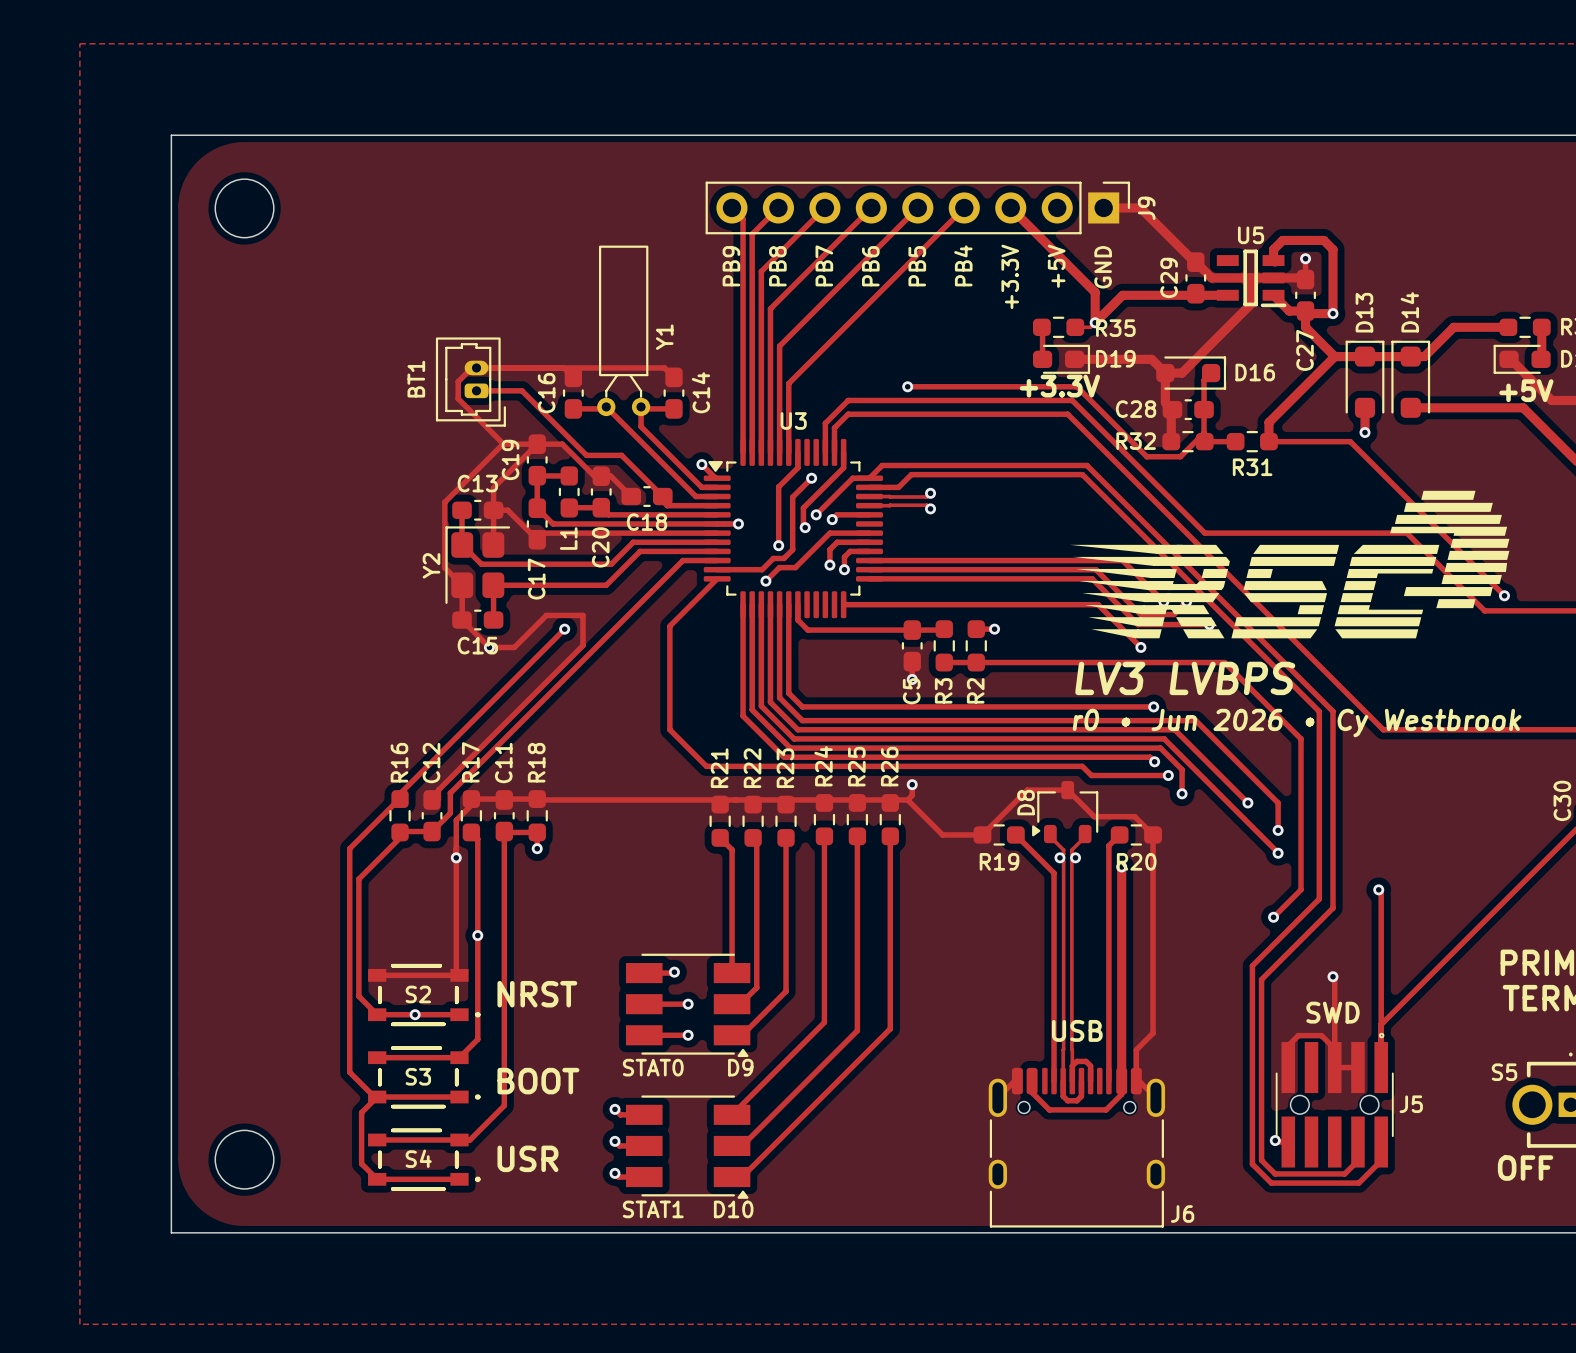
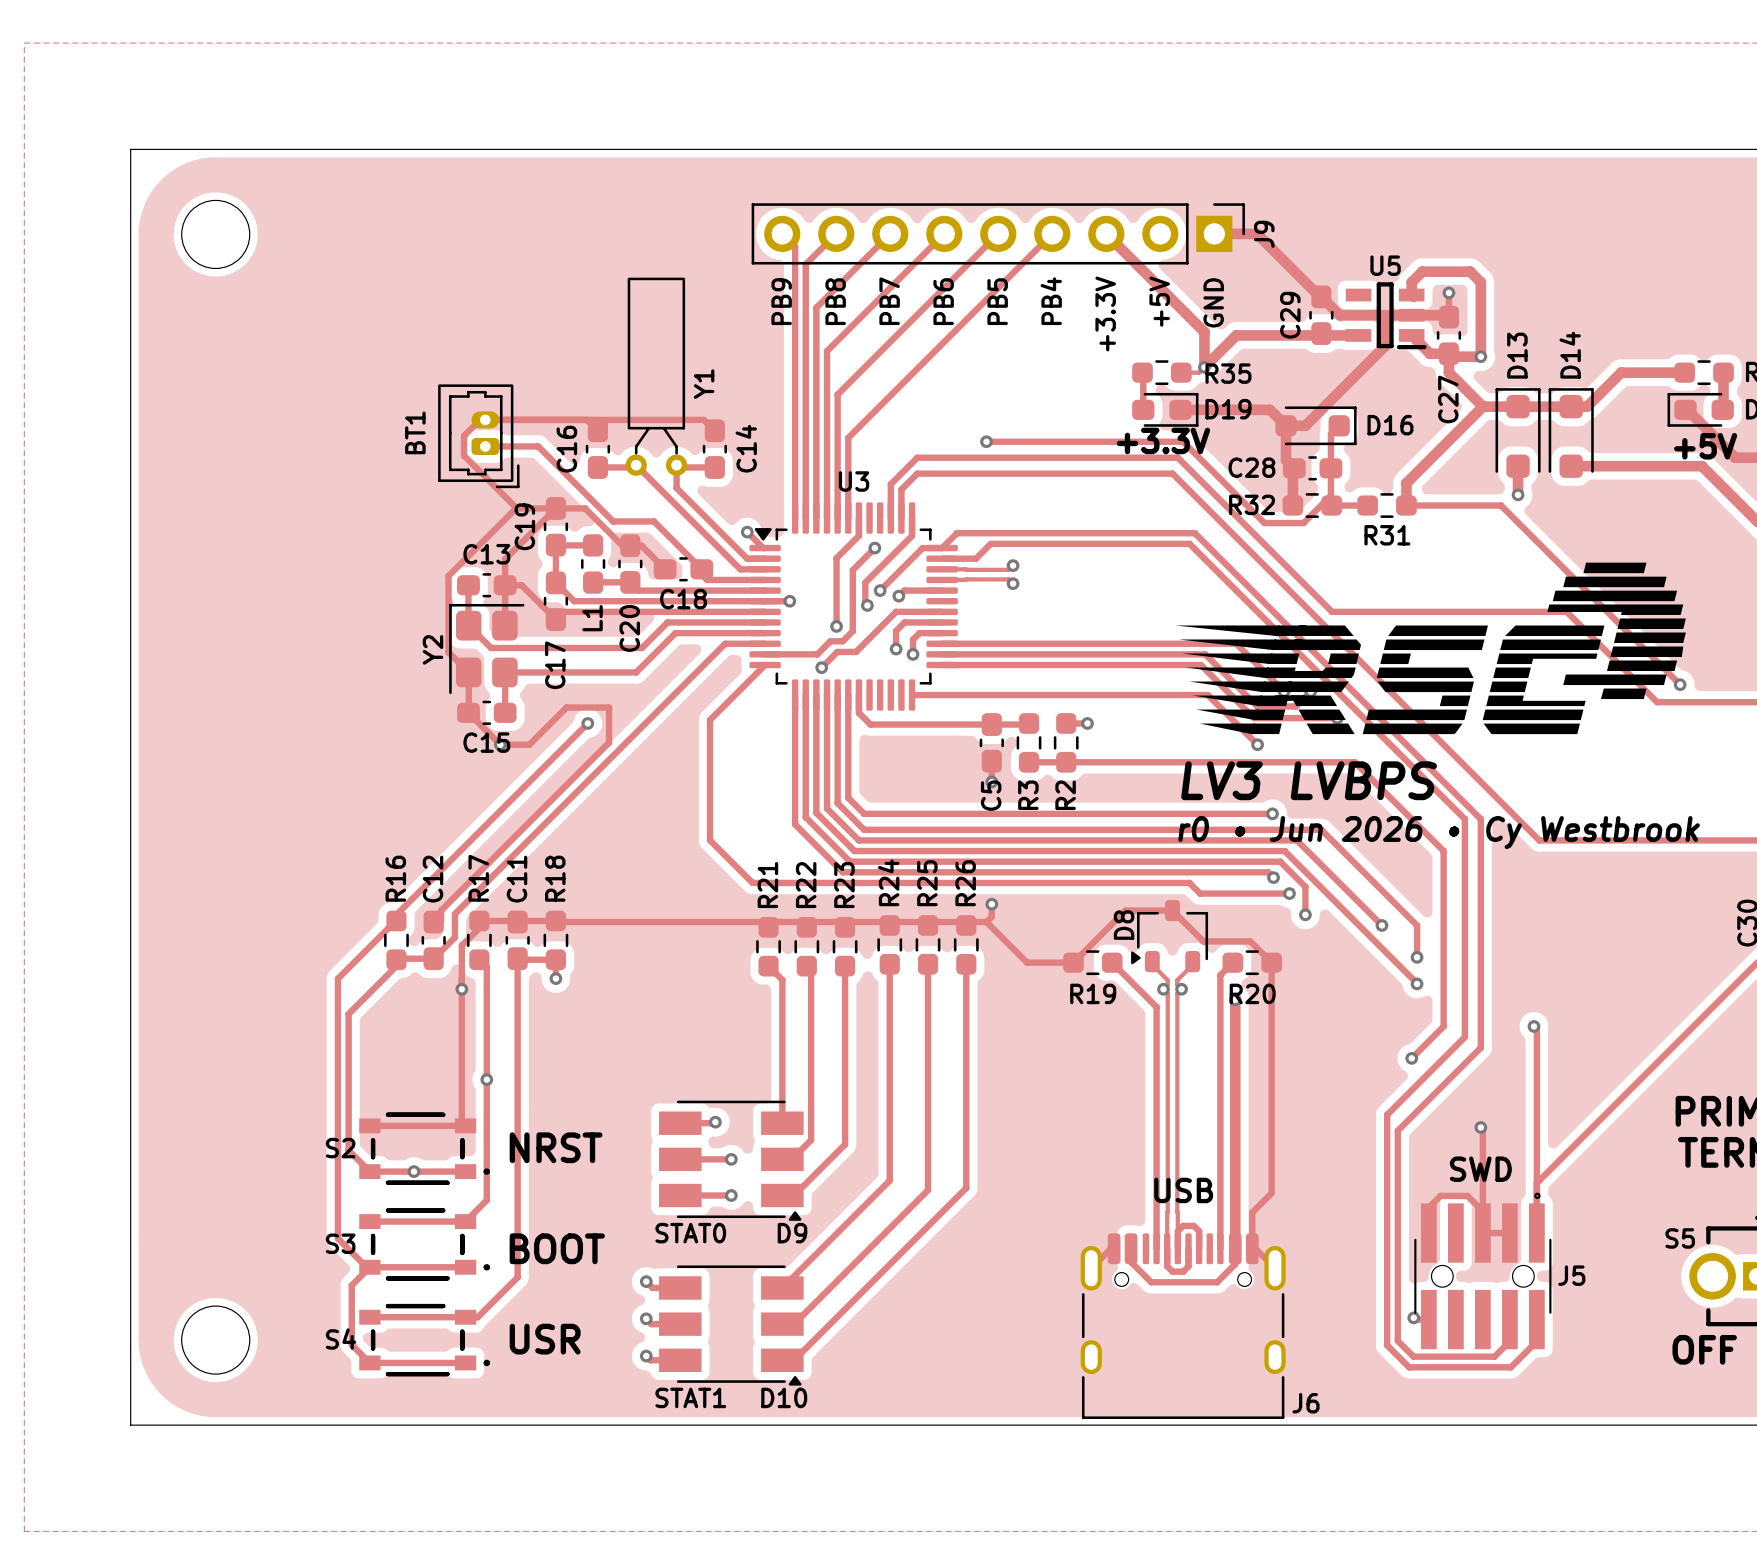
S2 name position: S2 (418, 994) -> S2 (340, 1148)
S3 name position: S3 (418, 1076) -> S3 (340, 1243)
S4 name position: S4 (418, 1158) -> S4 (341, 1339)

